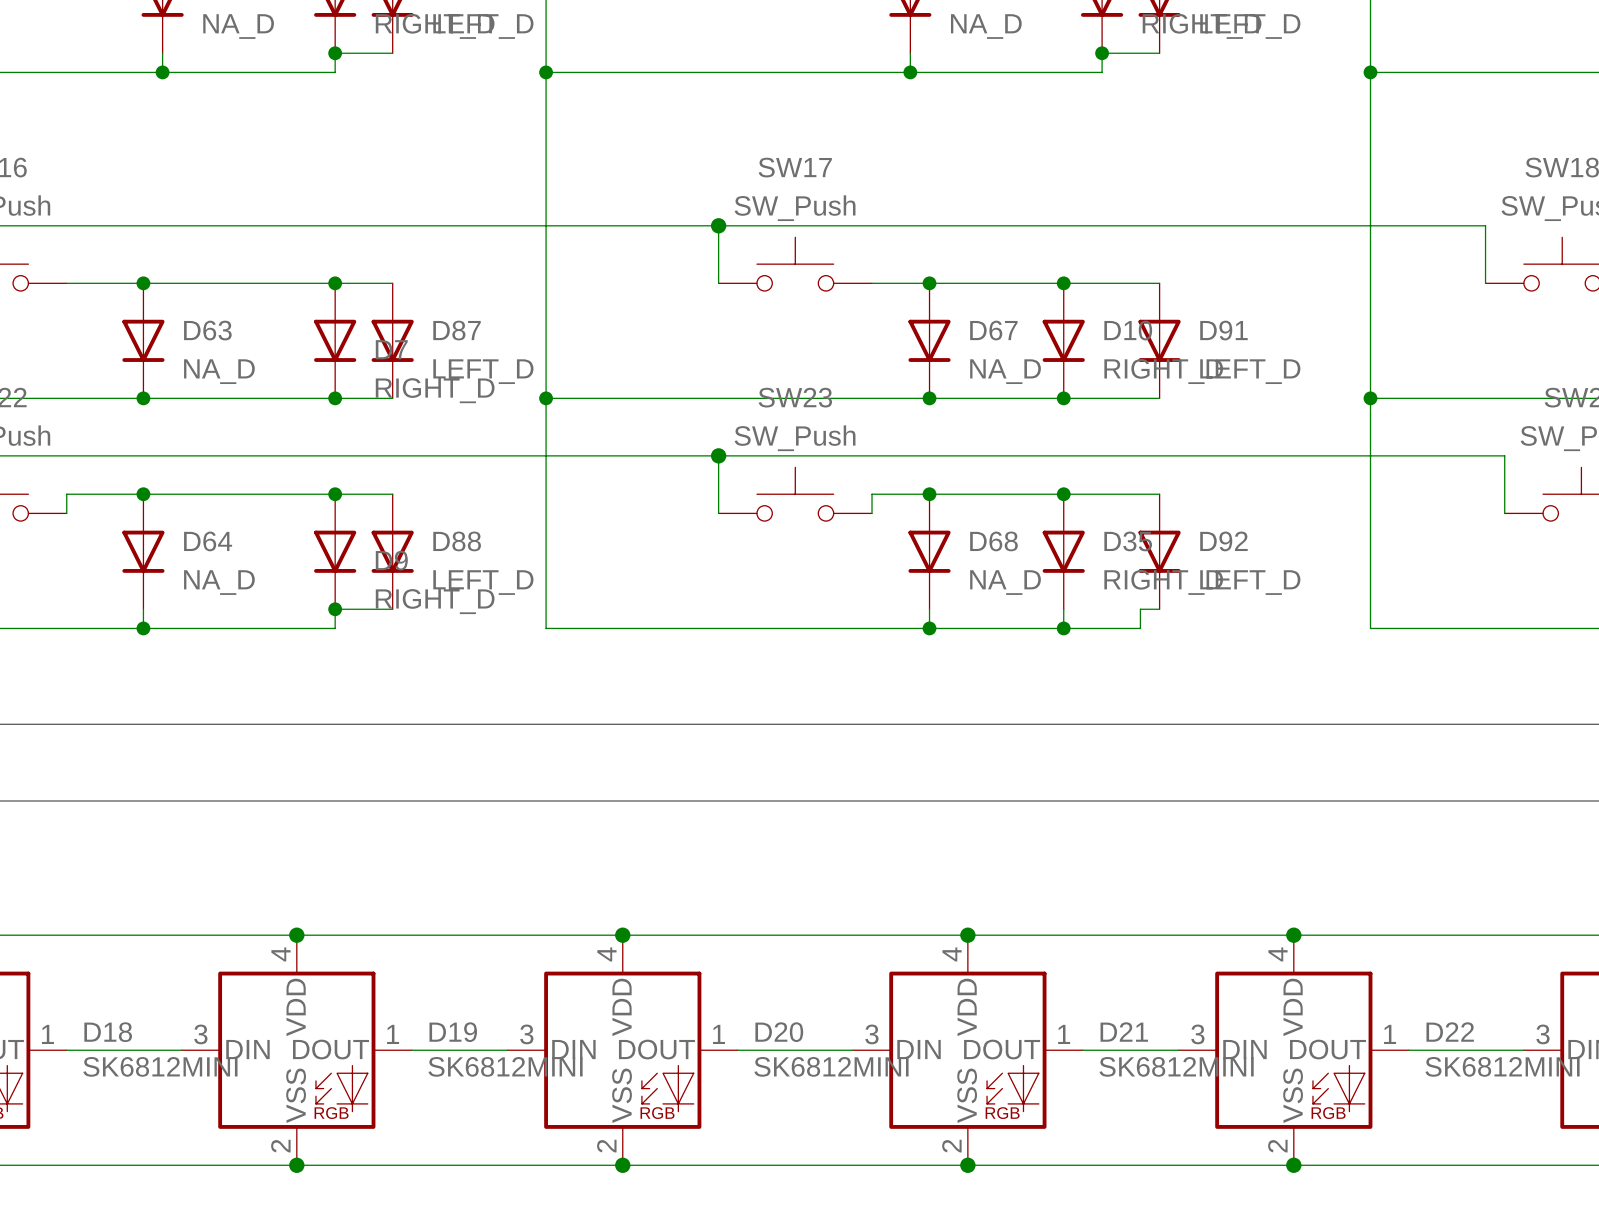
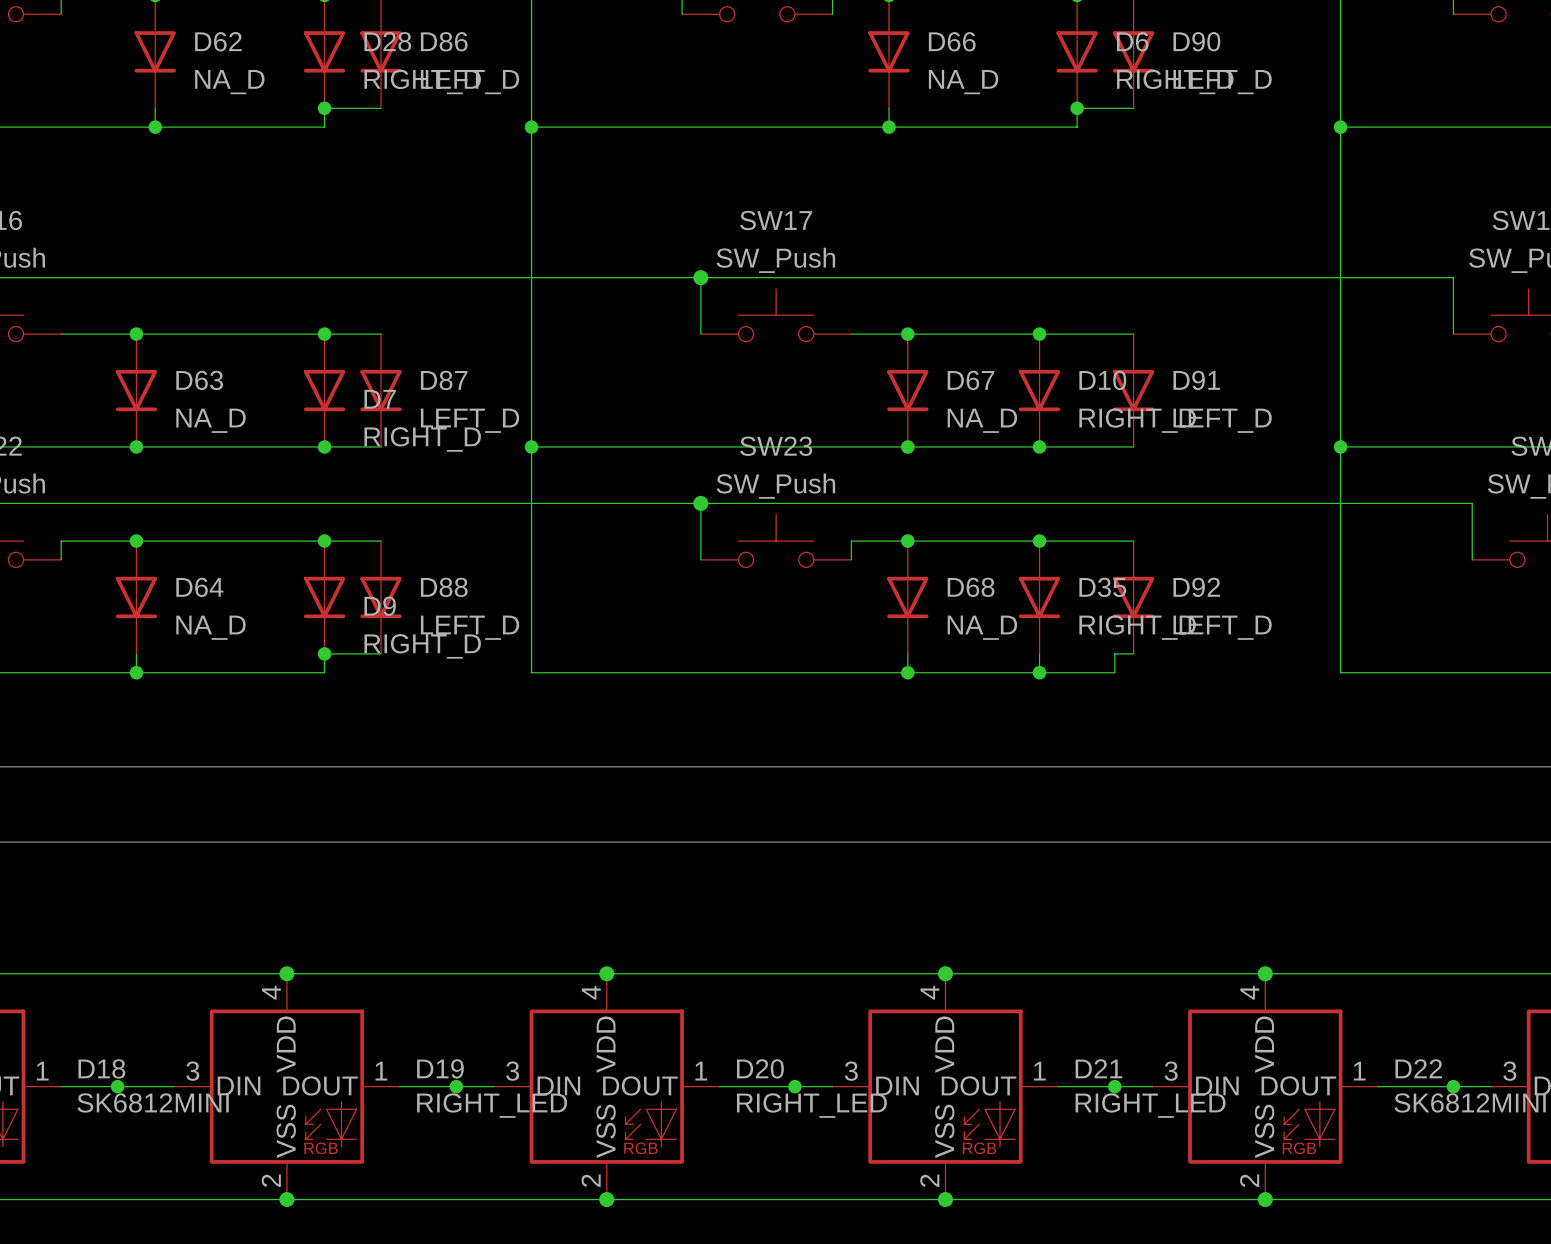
junction: none -> (117, 1086)
junction: none -> (456, 1086)
junction: none -> (794, 1086)
junction: none -> (1114, 1086)
junction: none -> (1453, 1086)
D19 value: SK6812MINI (505, 1066) -> RIGHT_LED (492, 1105)
D20 value: SK6812MINI (831, 1066) -> RIGHT_LED (811, 1105)
D21 value: SK6812MINI (1176, 1066) -> RIGHT_LED (1150, 1105)

